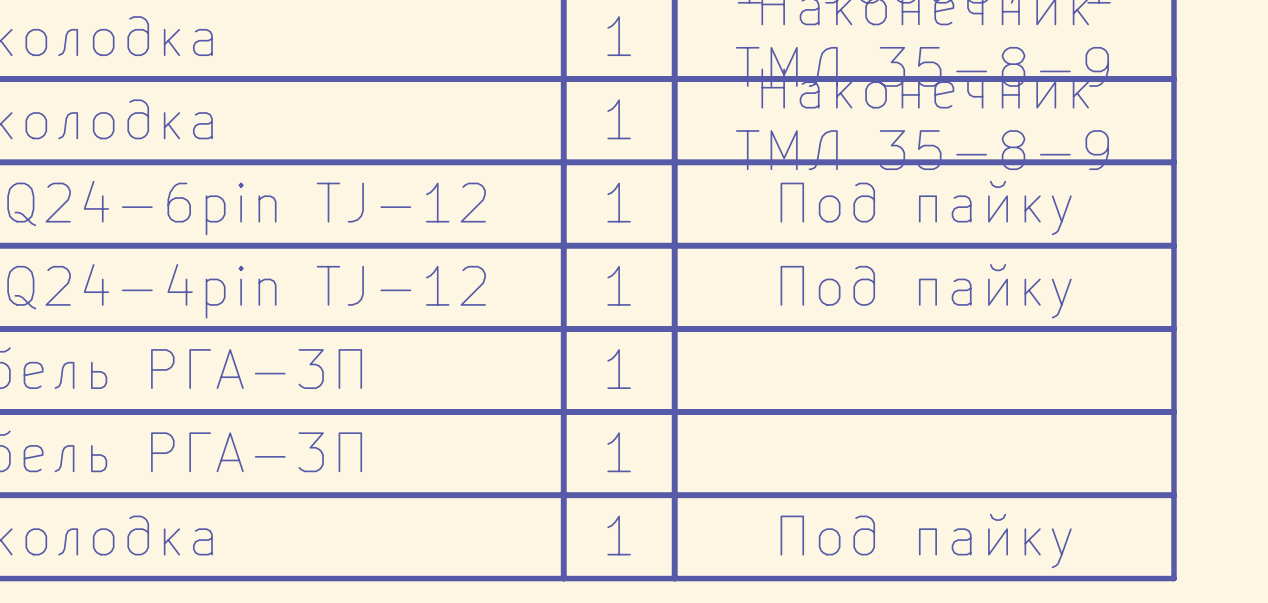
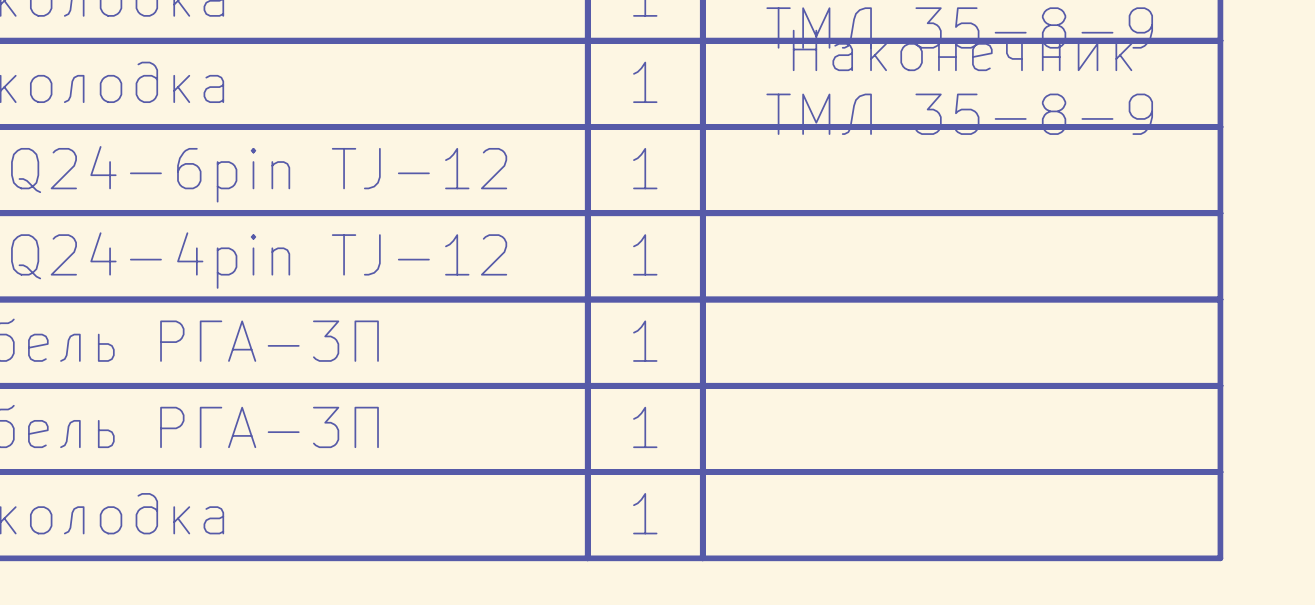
text: Под пайку (926, 208) -> none
text: Под пайку (926, 291) -> none
text: Под пайку (926, 540) -> none

